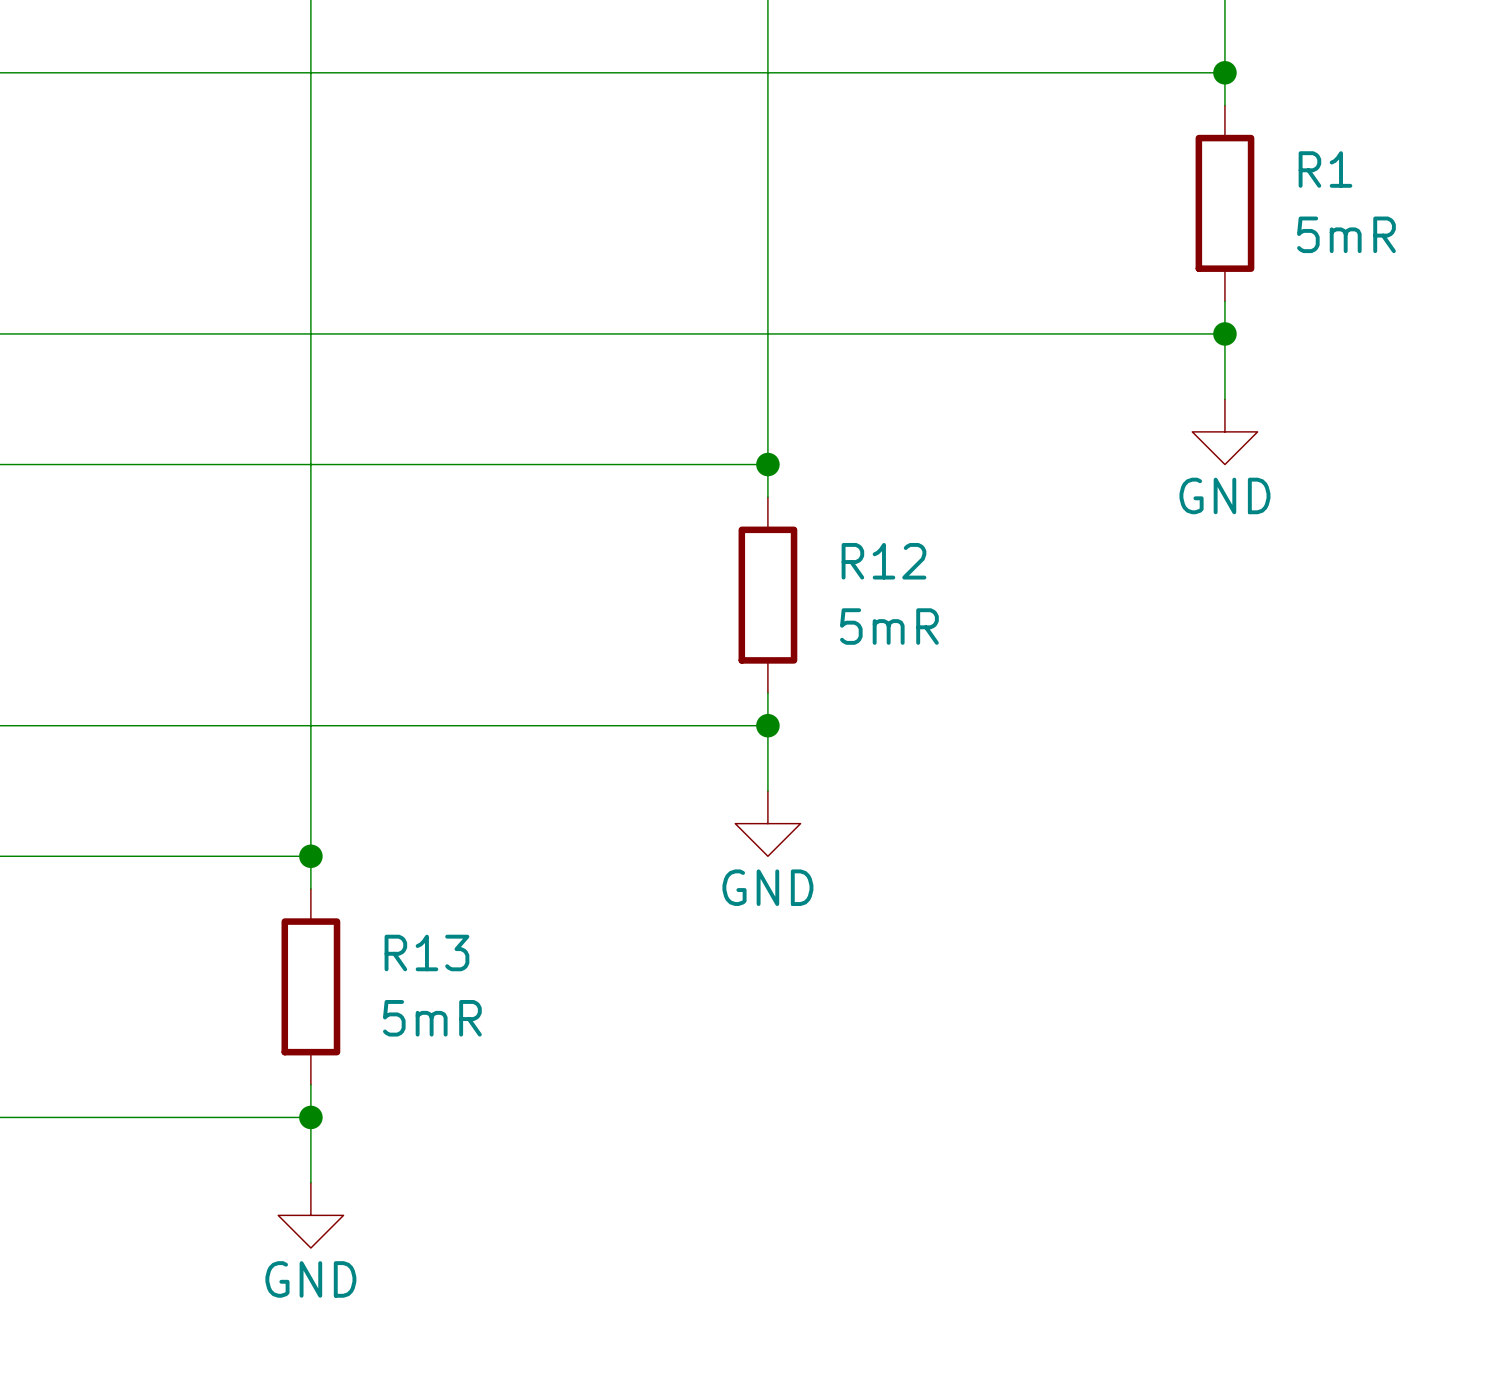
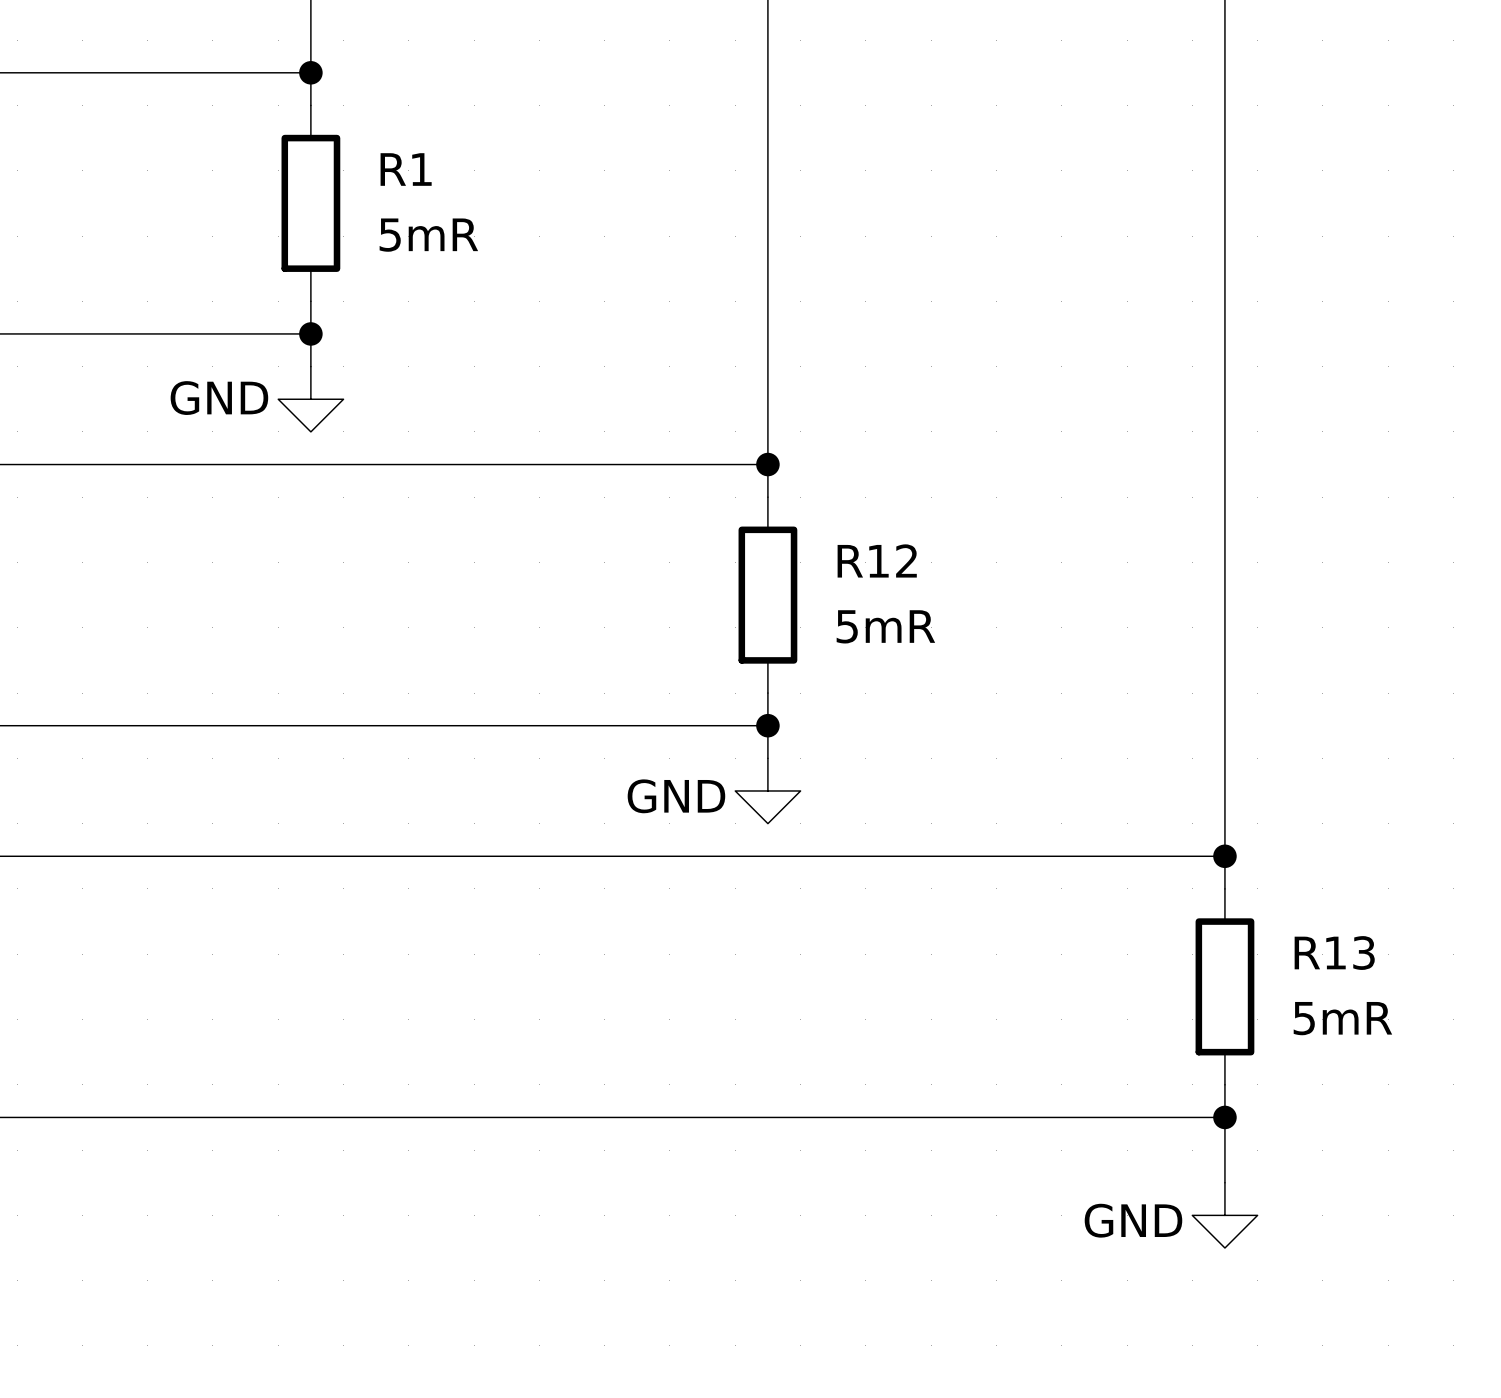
wire: (310, 72) (1224, 72) -> none
junction: none -> (310, 72)
junction: (1224, 72) -> none
wire: (310, 105) (310, 301) -> none
wire: none -> (1224, 105) (1224, 301)
R1 position: (1224, 203) -> (310, 203)
wire: (310, 333) (1224, 333) -> (310, 856) (1224, 856)
junction: none -> (310, 333)
junction: (1224, 333) -> none
wire: (310, 366) (310, 888) -> none
power symbol: none -> GND (310, 399)
wire: none -> (1224, 399) (1224, 888)
power symbol: GND (1224, 431) -> none
power symbol position: GND (767, 823) -> GND (767, 790)
junction: (310, 856) -> none
junction: none -> (1224, 856)
power symbol text position: GND (767, 887) -> GND (676, 796)
R13 position: (310, 986) -> (1224, 986)
wire: (310, 1084) (310, 1182) -> none
wire: none -> (1224, 1084) (1224, 1182)
wire: none -> (310, 1117) (1224, 1117)
junction: (310, 1117) -> none
junction: none -> (1224, 1117)
power symbol: GND (310, 1215) -> none
power symbol: none -> GND (1224, 1215)

